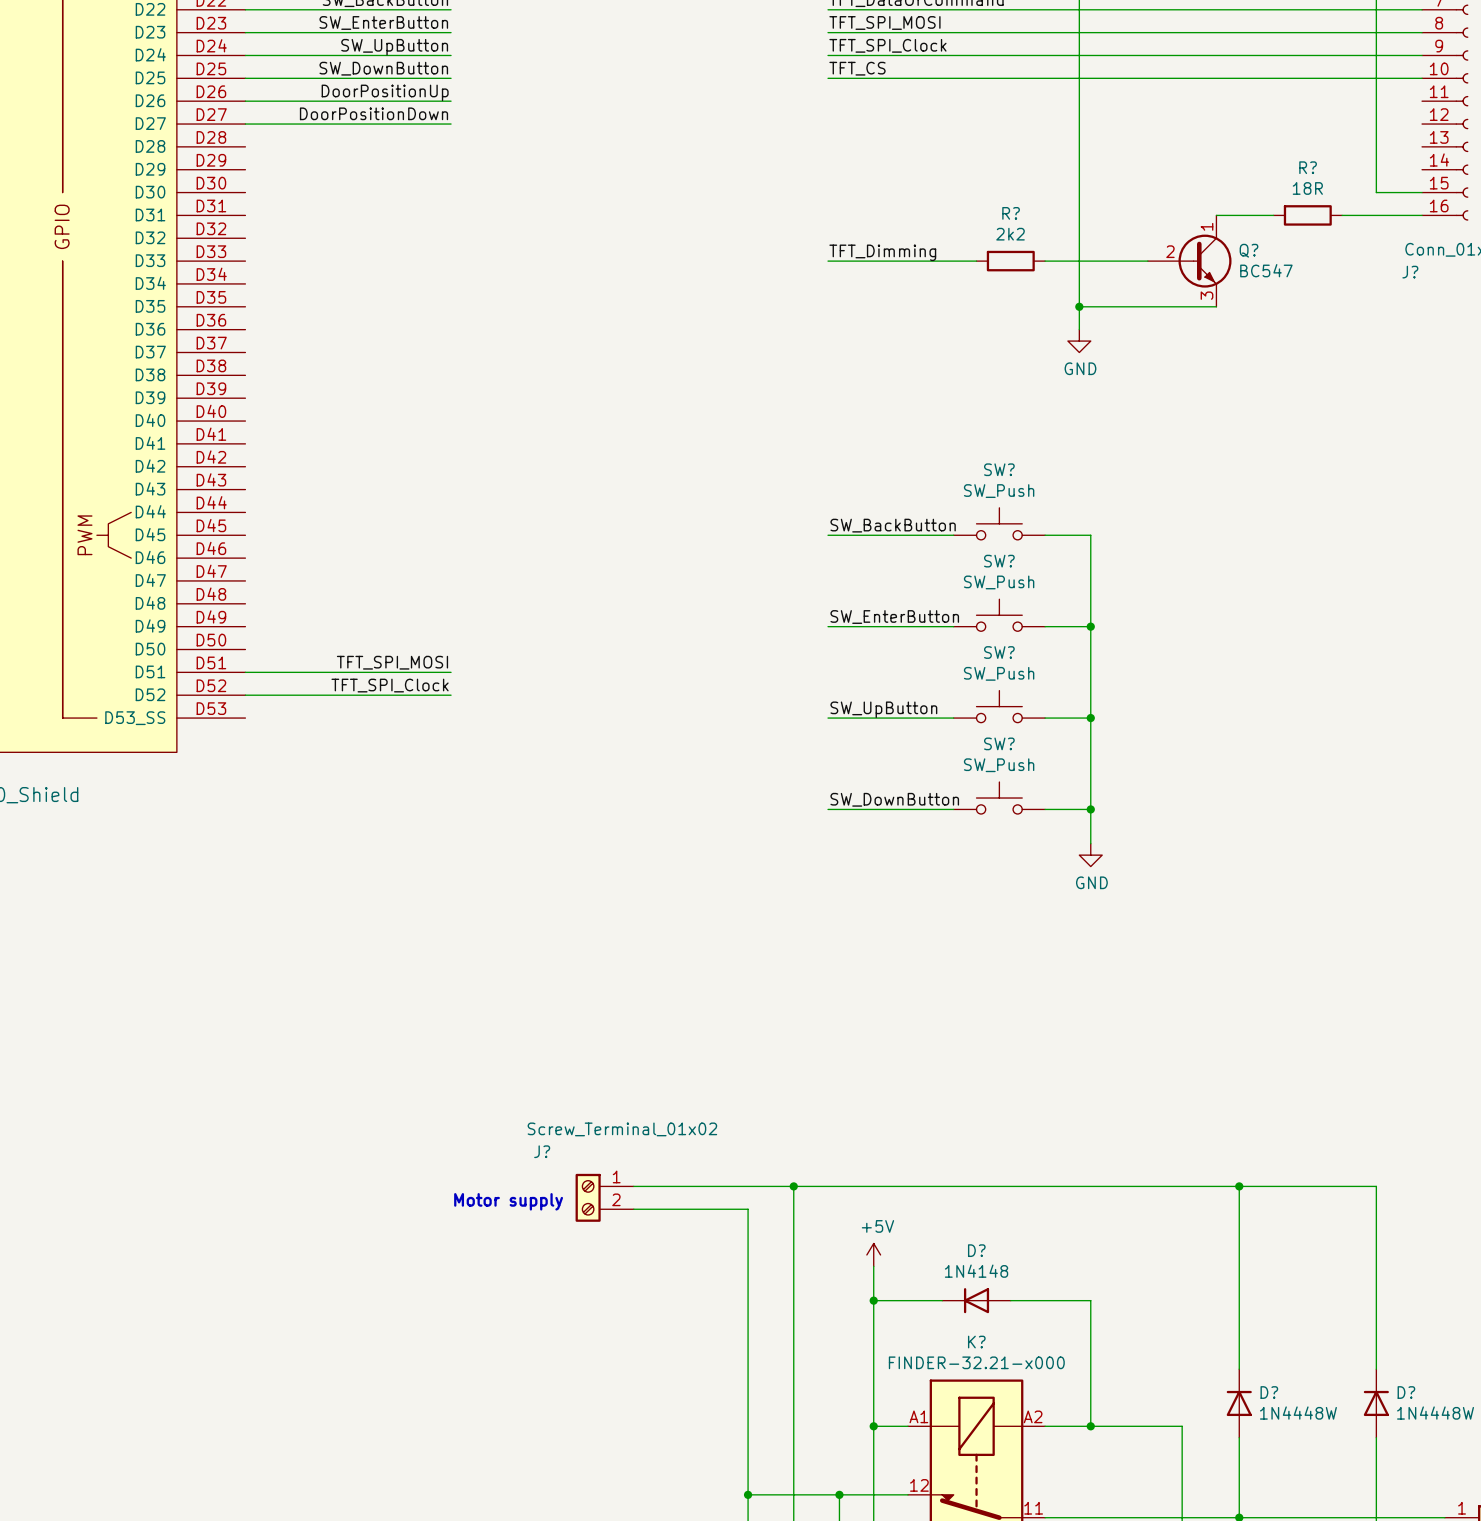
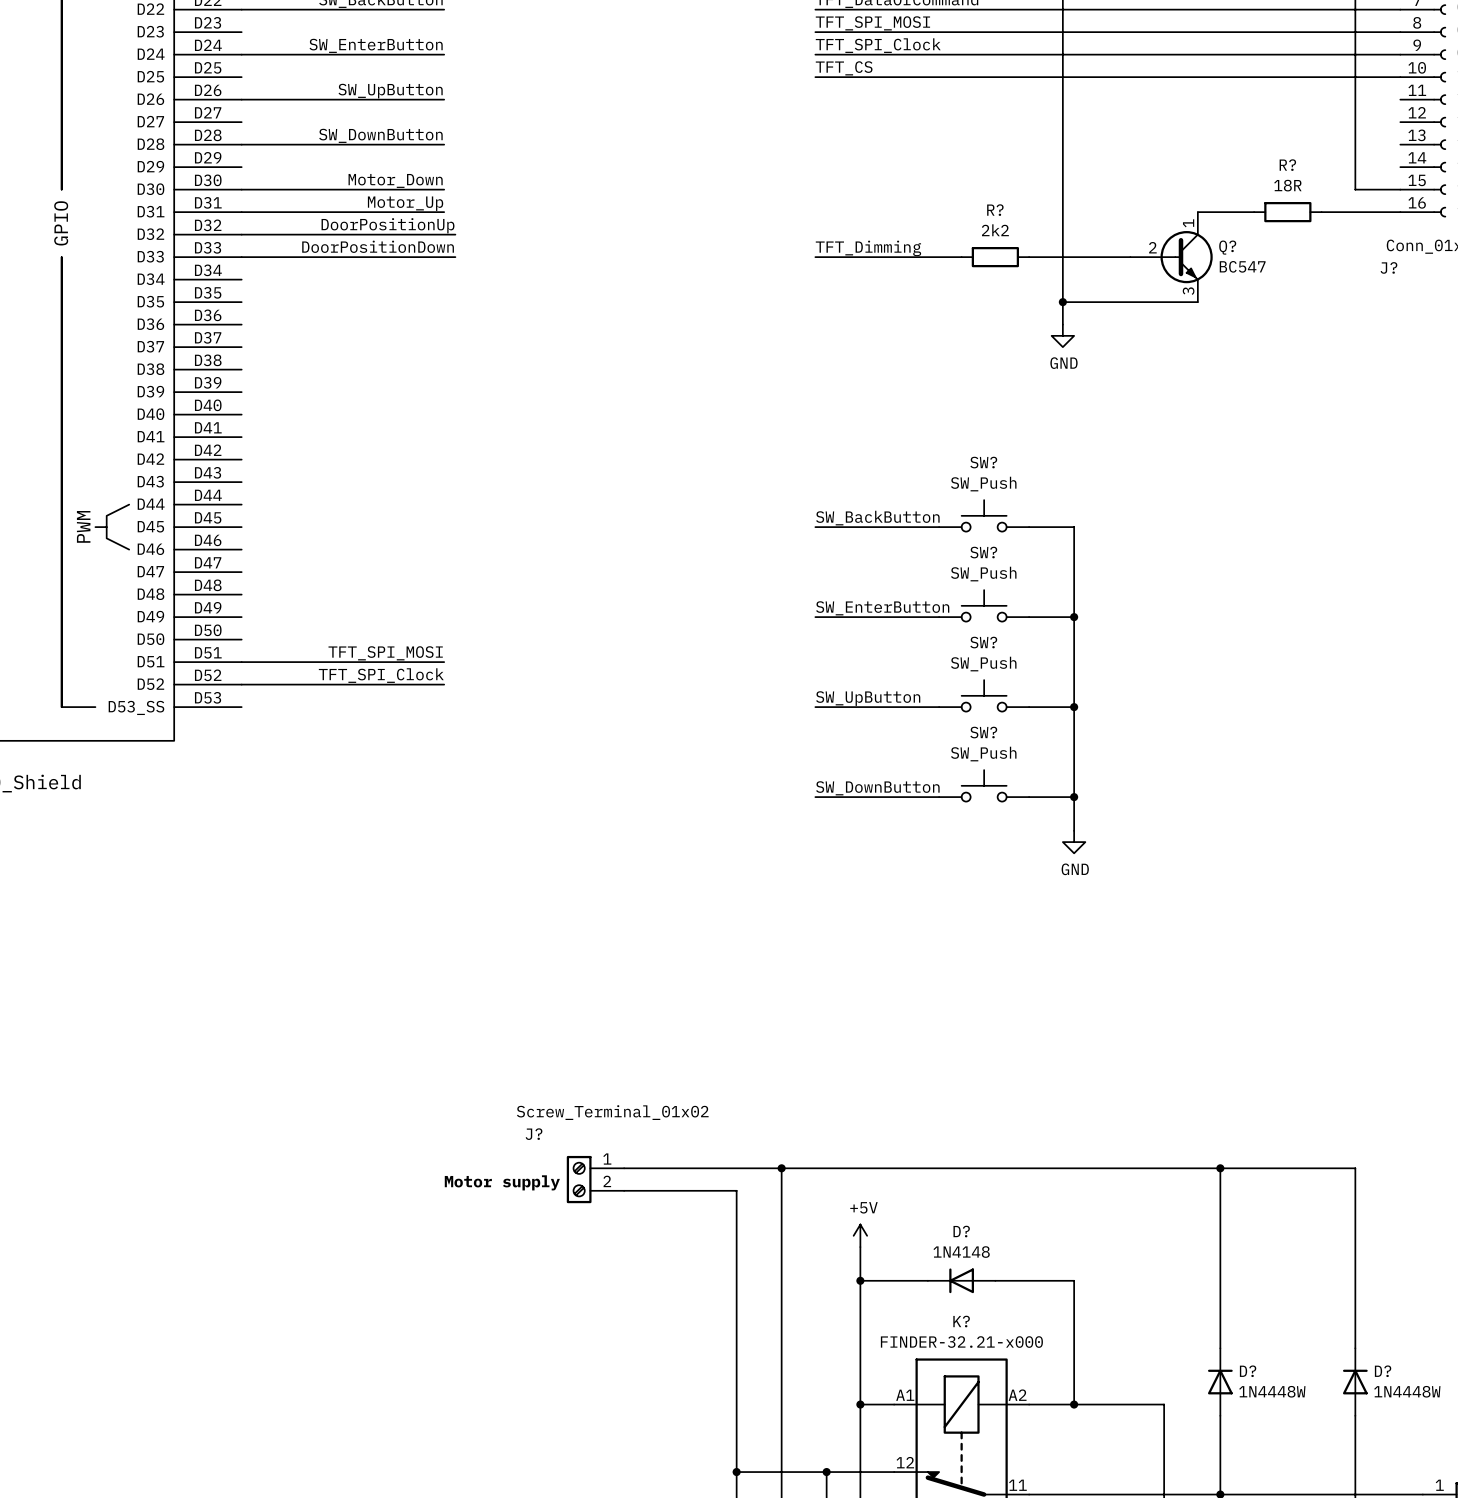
label: SW_EnterButton (383, 22) -> none
wire: (245, 32) (451, 32) -> (241, 212) (444, 212)
label: SW_UpButton (394, 47) -> SW_EnterButton (376, 45)
label position: SW_DownButton (383, 68) -> SW_DownButton (380, 135)
wire: (245, 78) (451, 78) -> (241, 144) (444, 144)
label: DoorPositionUp (385, 92) -> SW_UpButton (390, 91)
label position: DoorPositionDown (373, 113) -> DoorPositionDown (378, 246)
wire: (245, 124) (451, 124) -> (241, 189) (444, 189)
label: none -> Motor_Down (395, 180)
label: none -> Motor_Up (405, 203)
label: none -> DoorPositionUp (388, 225)
wire: none -> (241, 234) (455, 234)
wire: none -> (241, 257) (455, 257)

